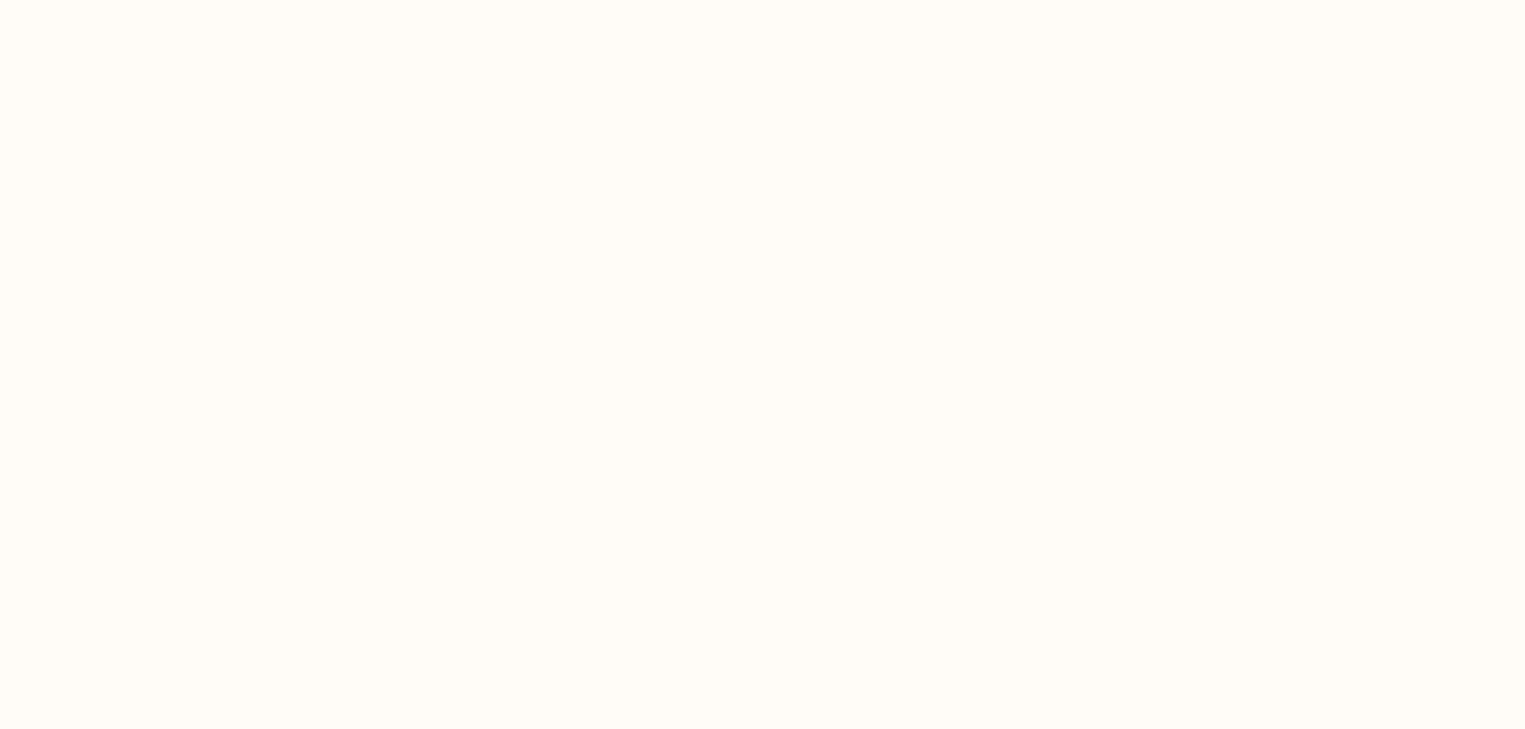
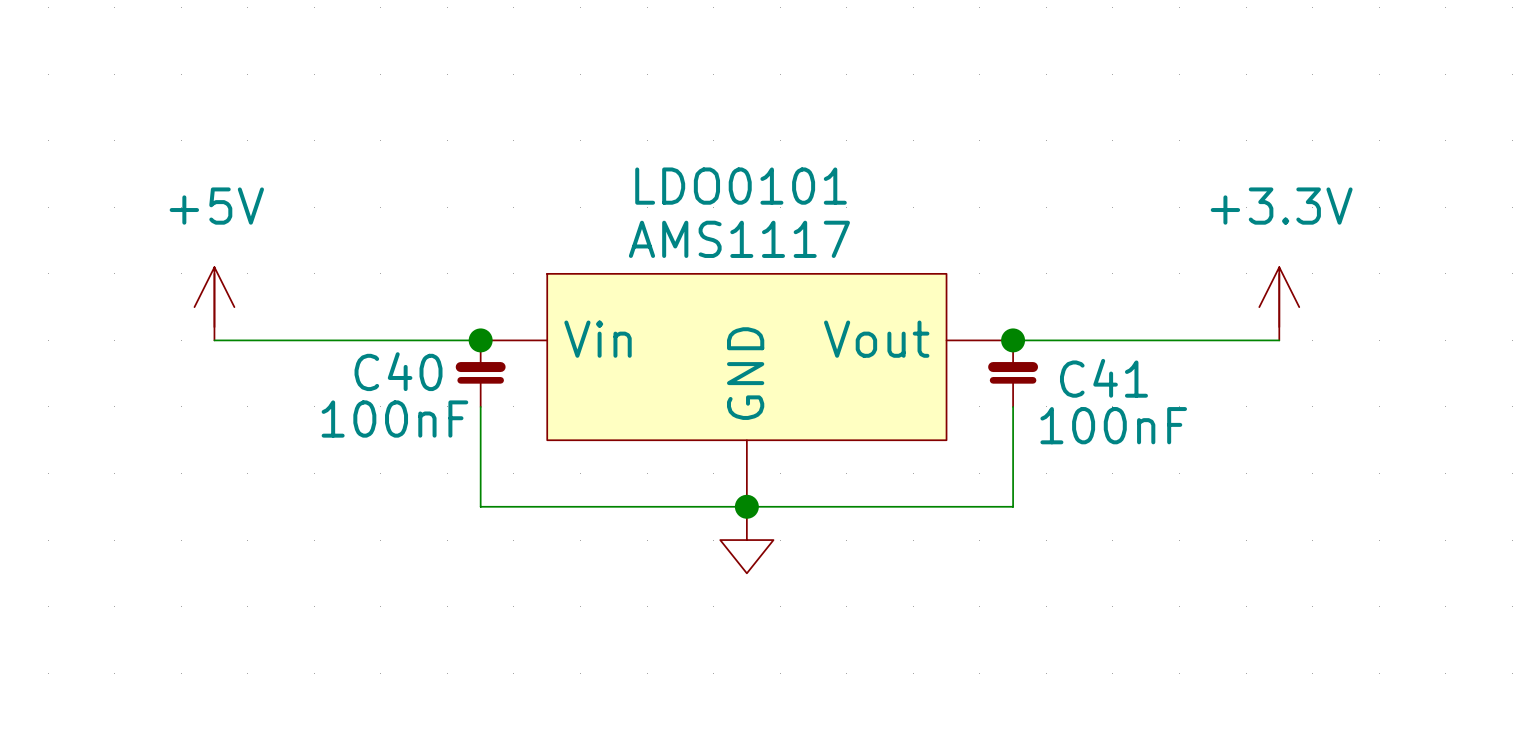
power symbol: none -> +5V (214, 303)
power symbol: none -> +3.3V (1279, 303)
wire: none -> (214, 340) (480, 340)
junction: none -> (480, 340)
wire: none -> (1013, 340) (1279, 340)
junction: none -> (1013, 340)
C40: none -> 100nF (480, 373)
C41: none -> 100nF (1013, 373)
LDO0101: none -> AMS1117 (746, 390)
wire: none -> (480, 406) (480, 506) (1013, 506) (1013, 406)
junction: none -> (746, 506)
power symbol: none -> (746, 540)

